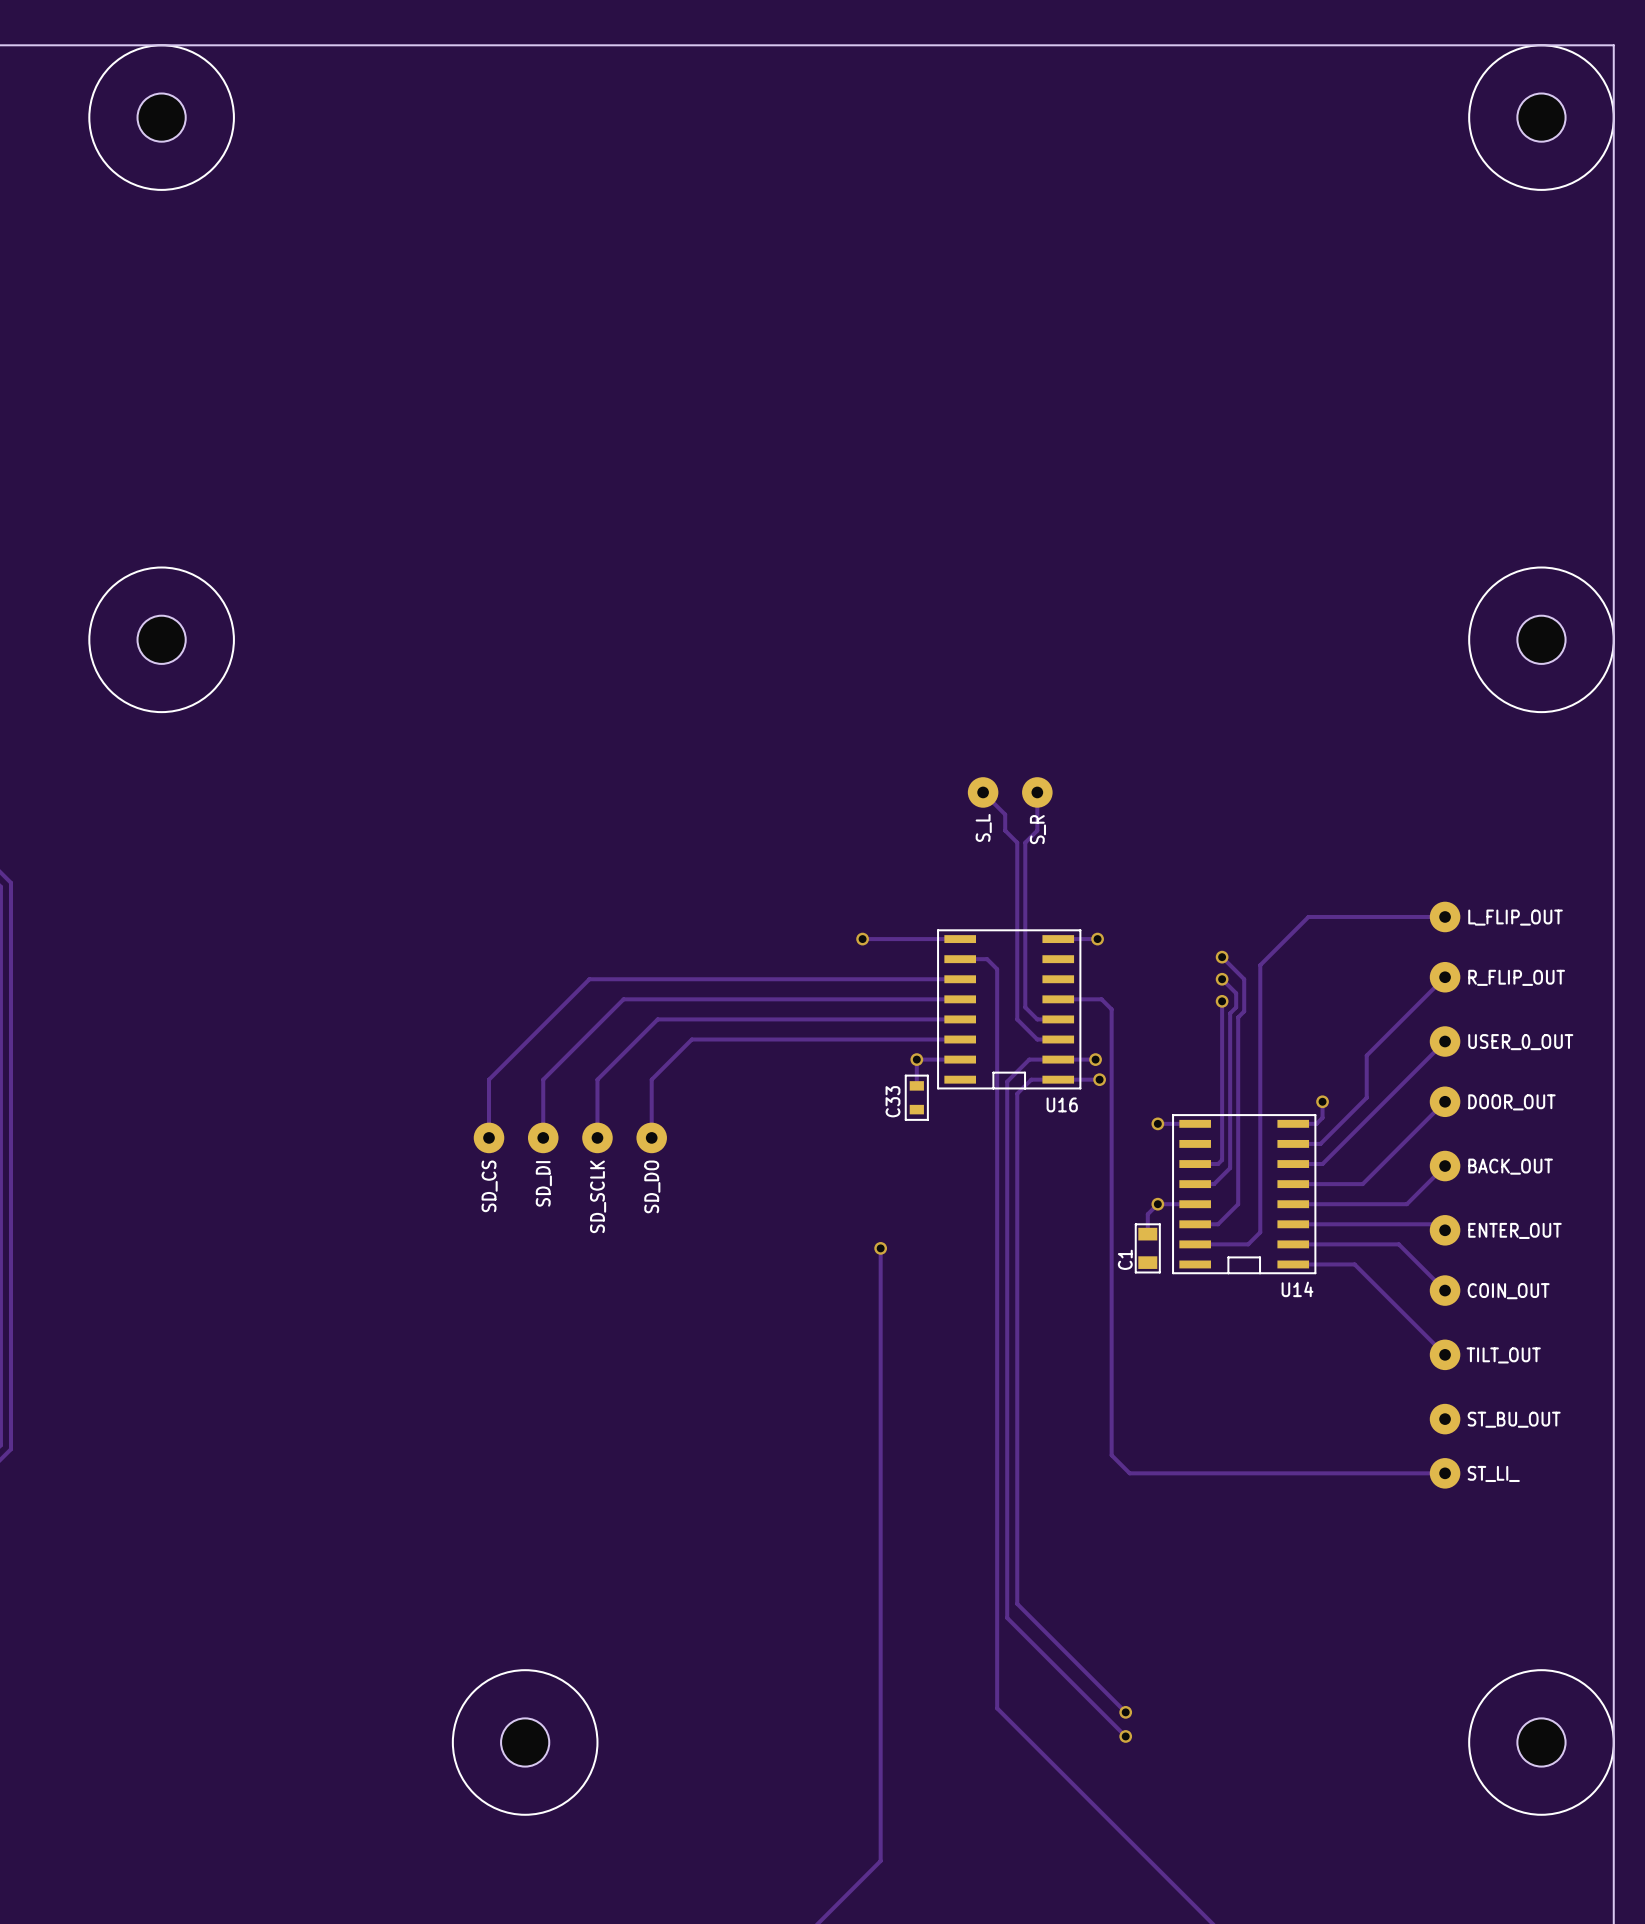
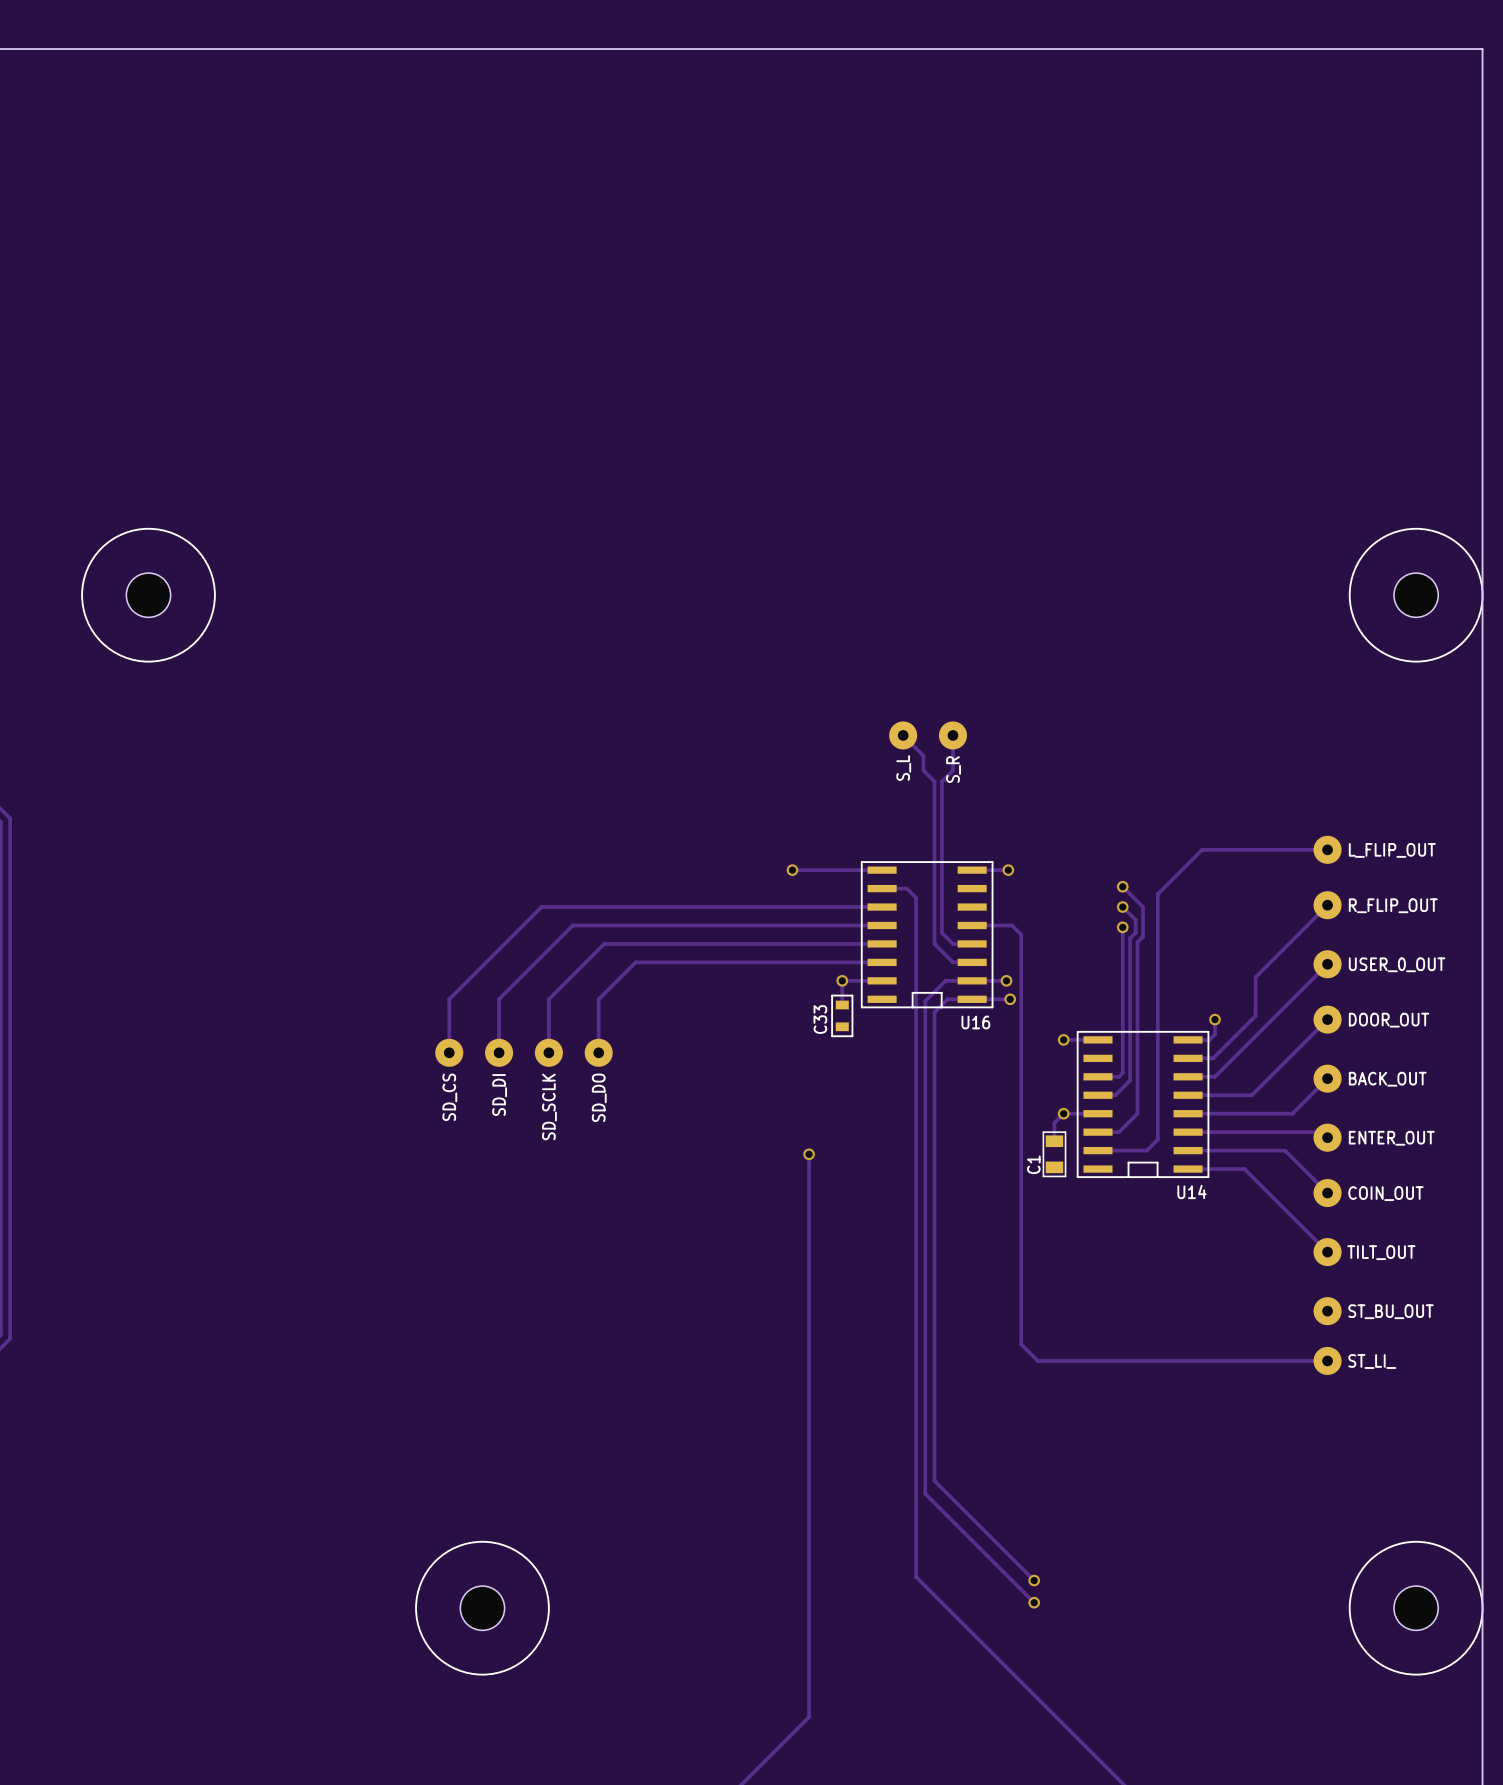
part: (161, 117) -> none
part: (1541, 117) -> none

